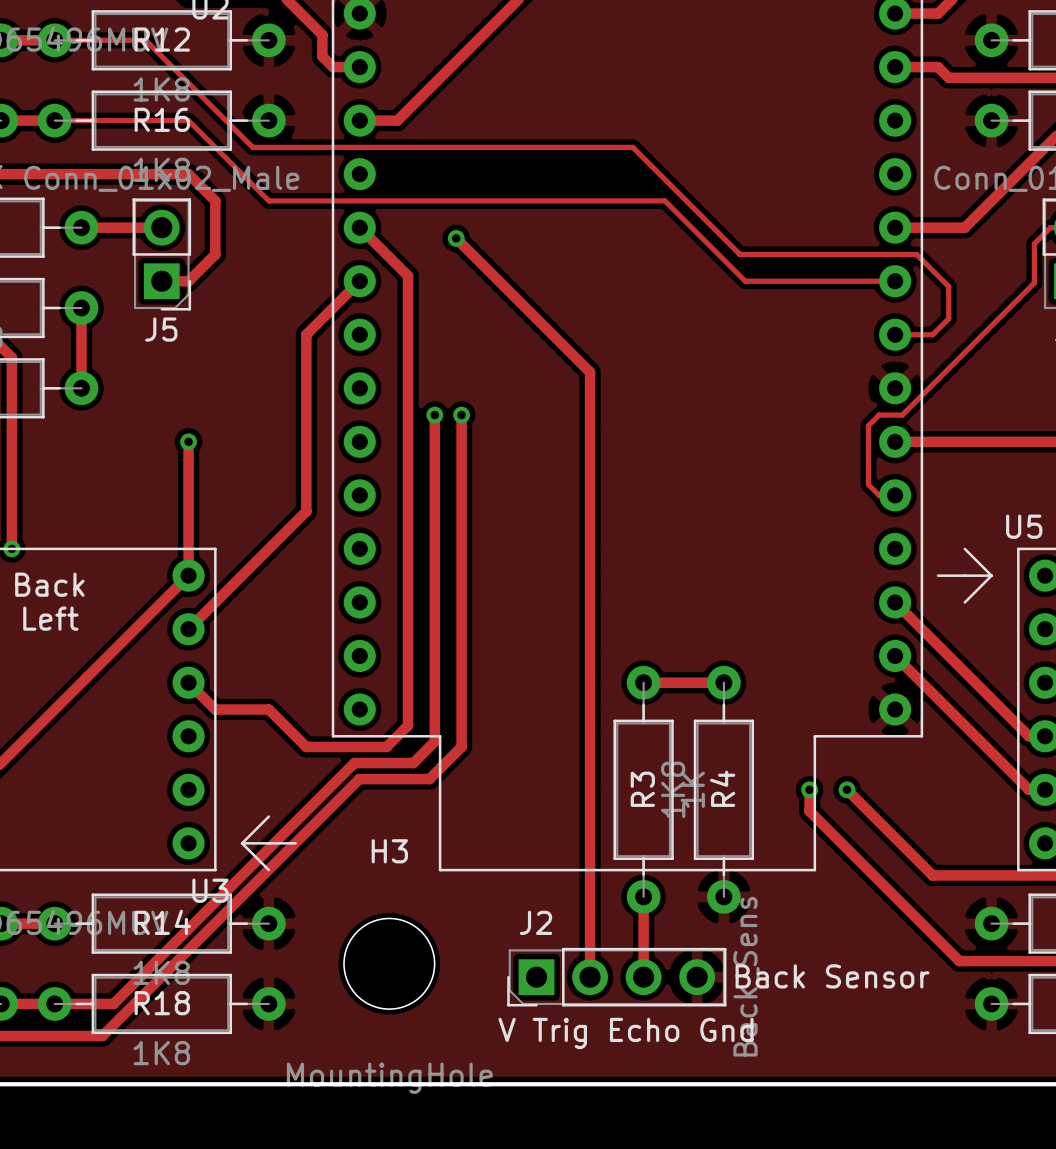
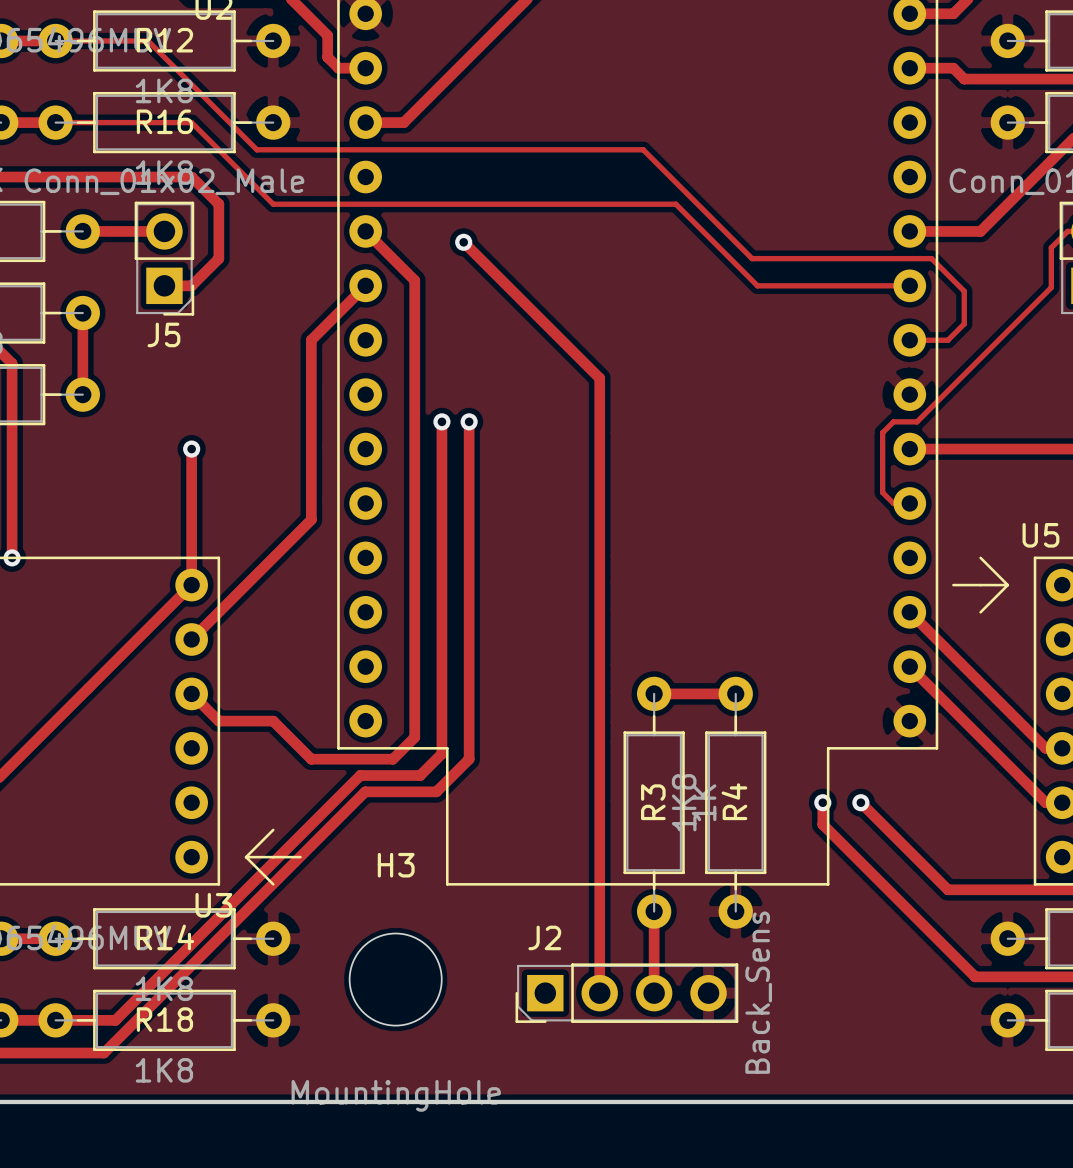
text: Back (49, 584) -> none
text: Left (50, 618) -> none
text: Back Sensor (832, 976) -> none
text: V Trig Echo Gnd (626, 1033) -> none

